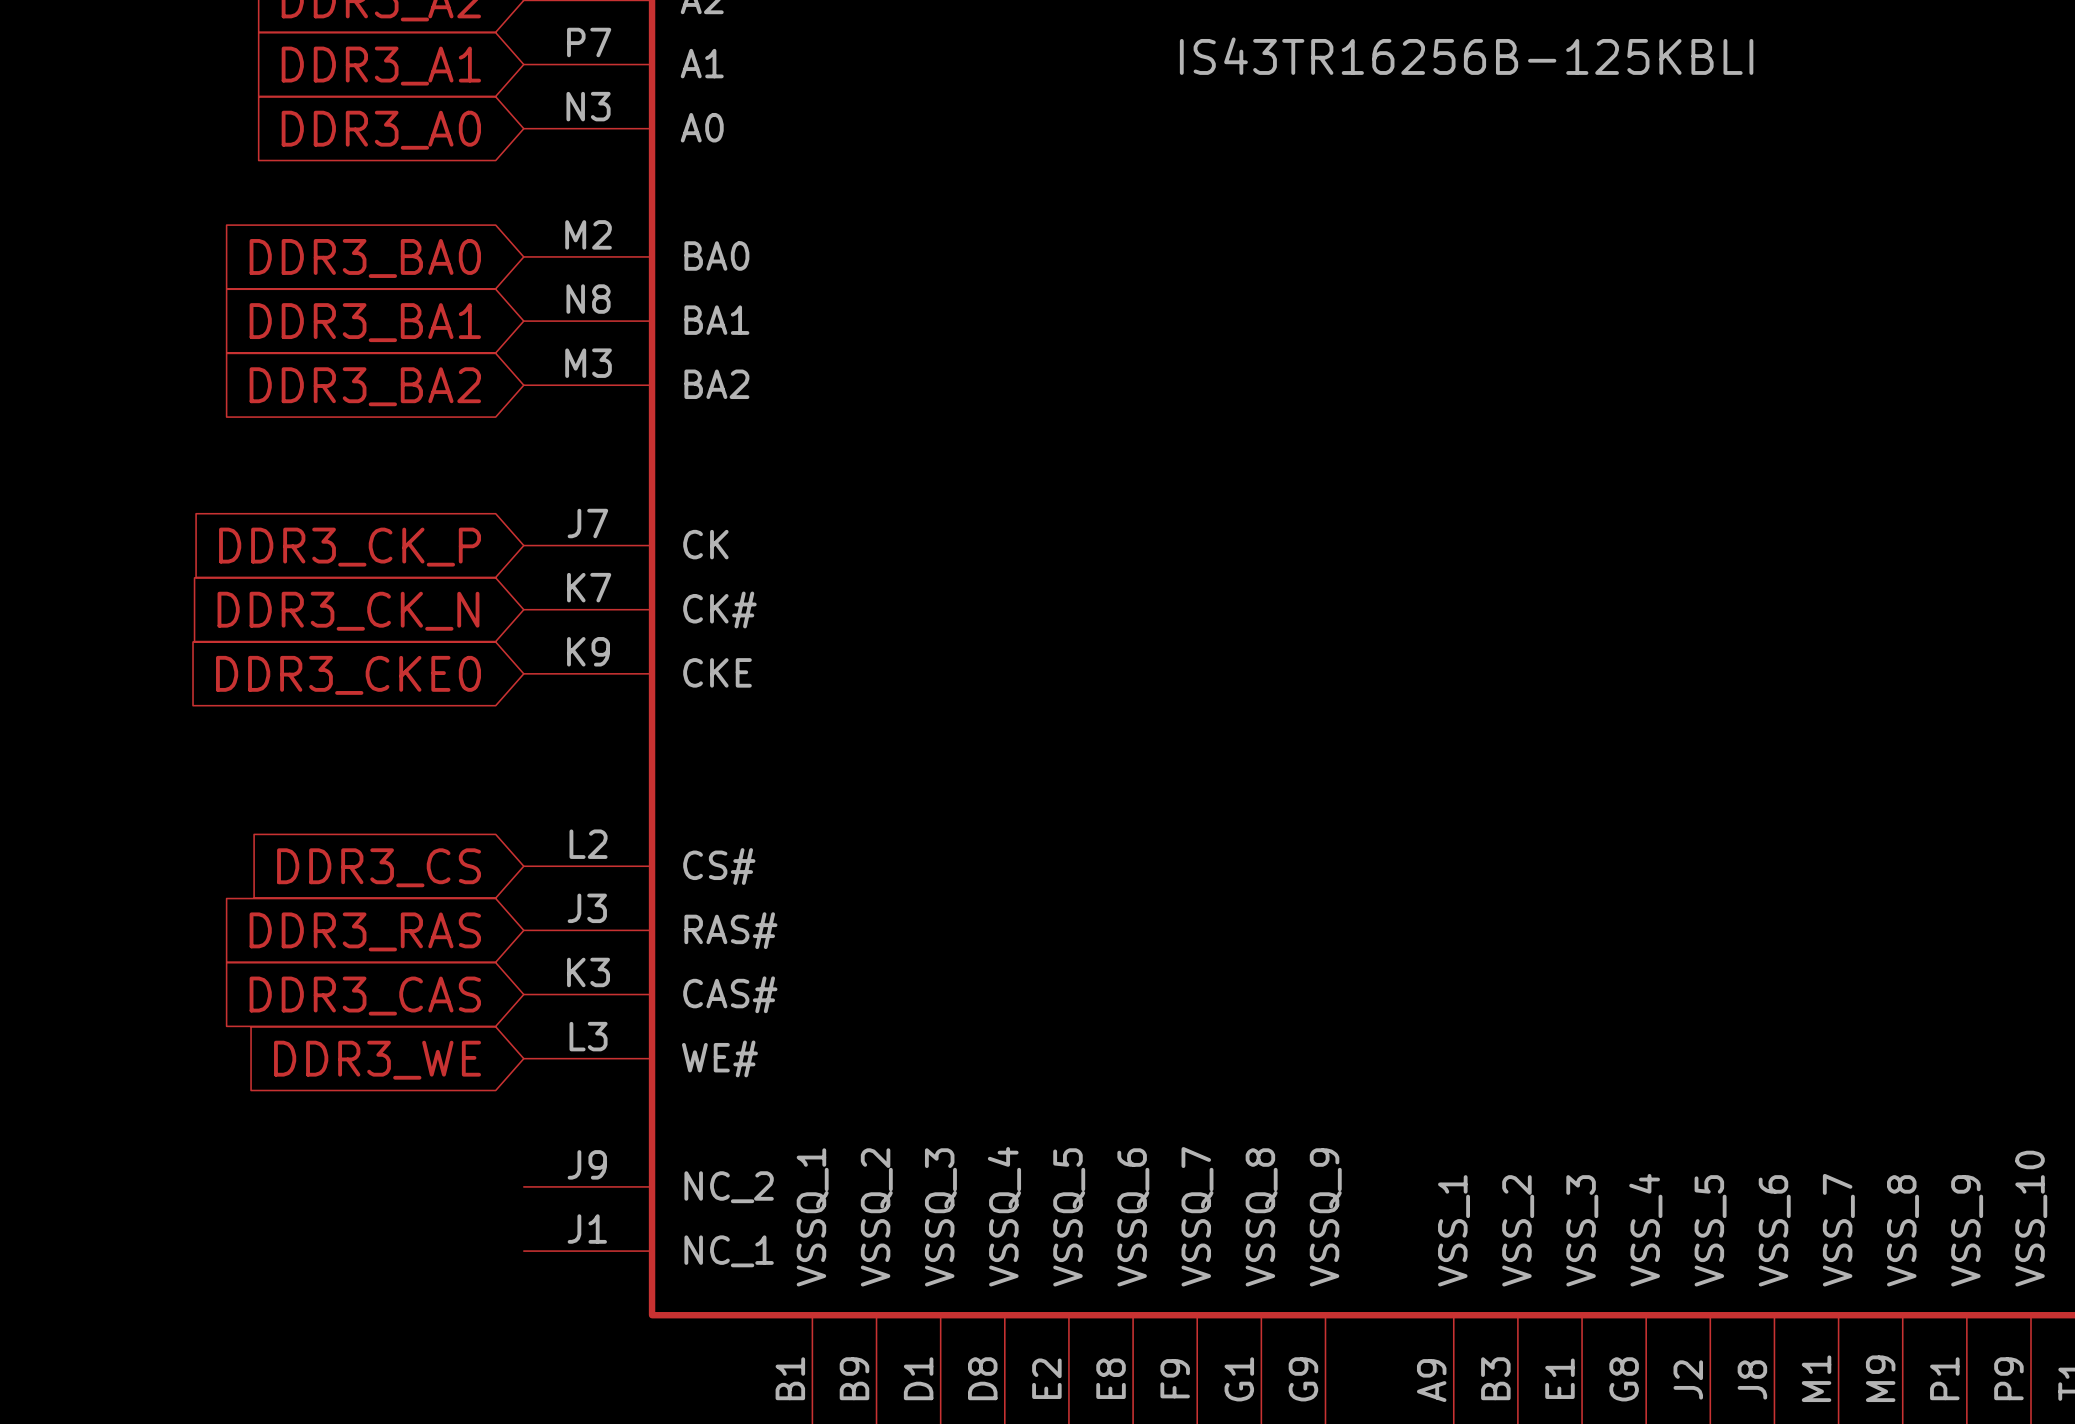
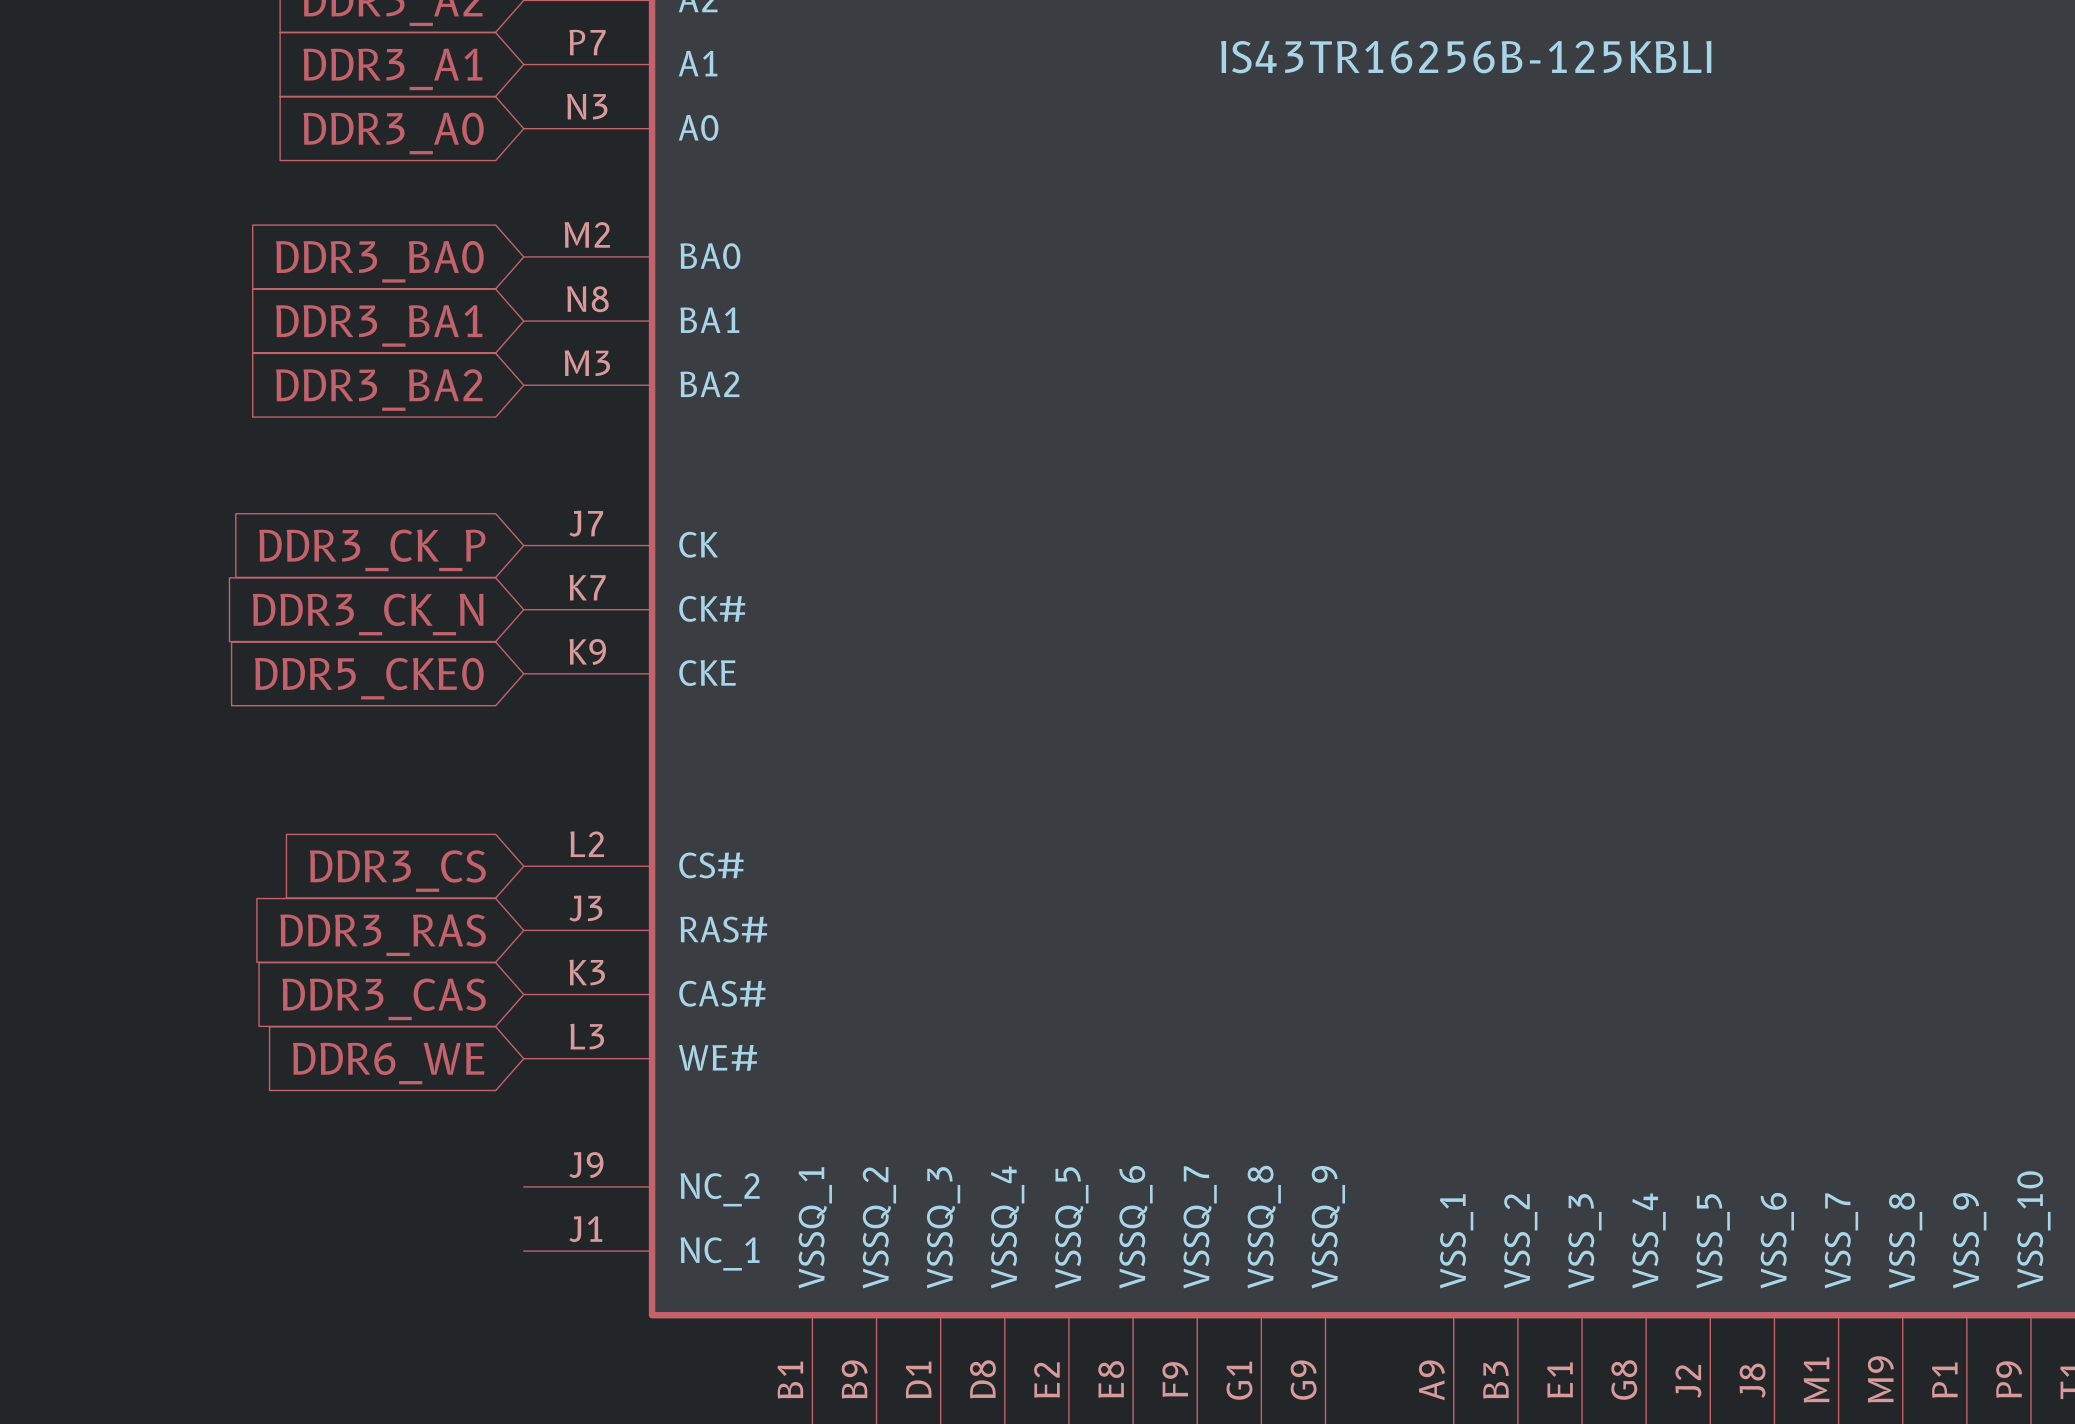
global label: DDR3_CKE0 (348, 675) -> DDR5_CKE0 (369, 678)
global label: DDR3_WE (377, 1060) -> DDR6_WE (388, 1063)

